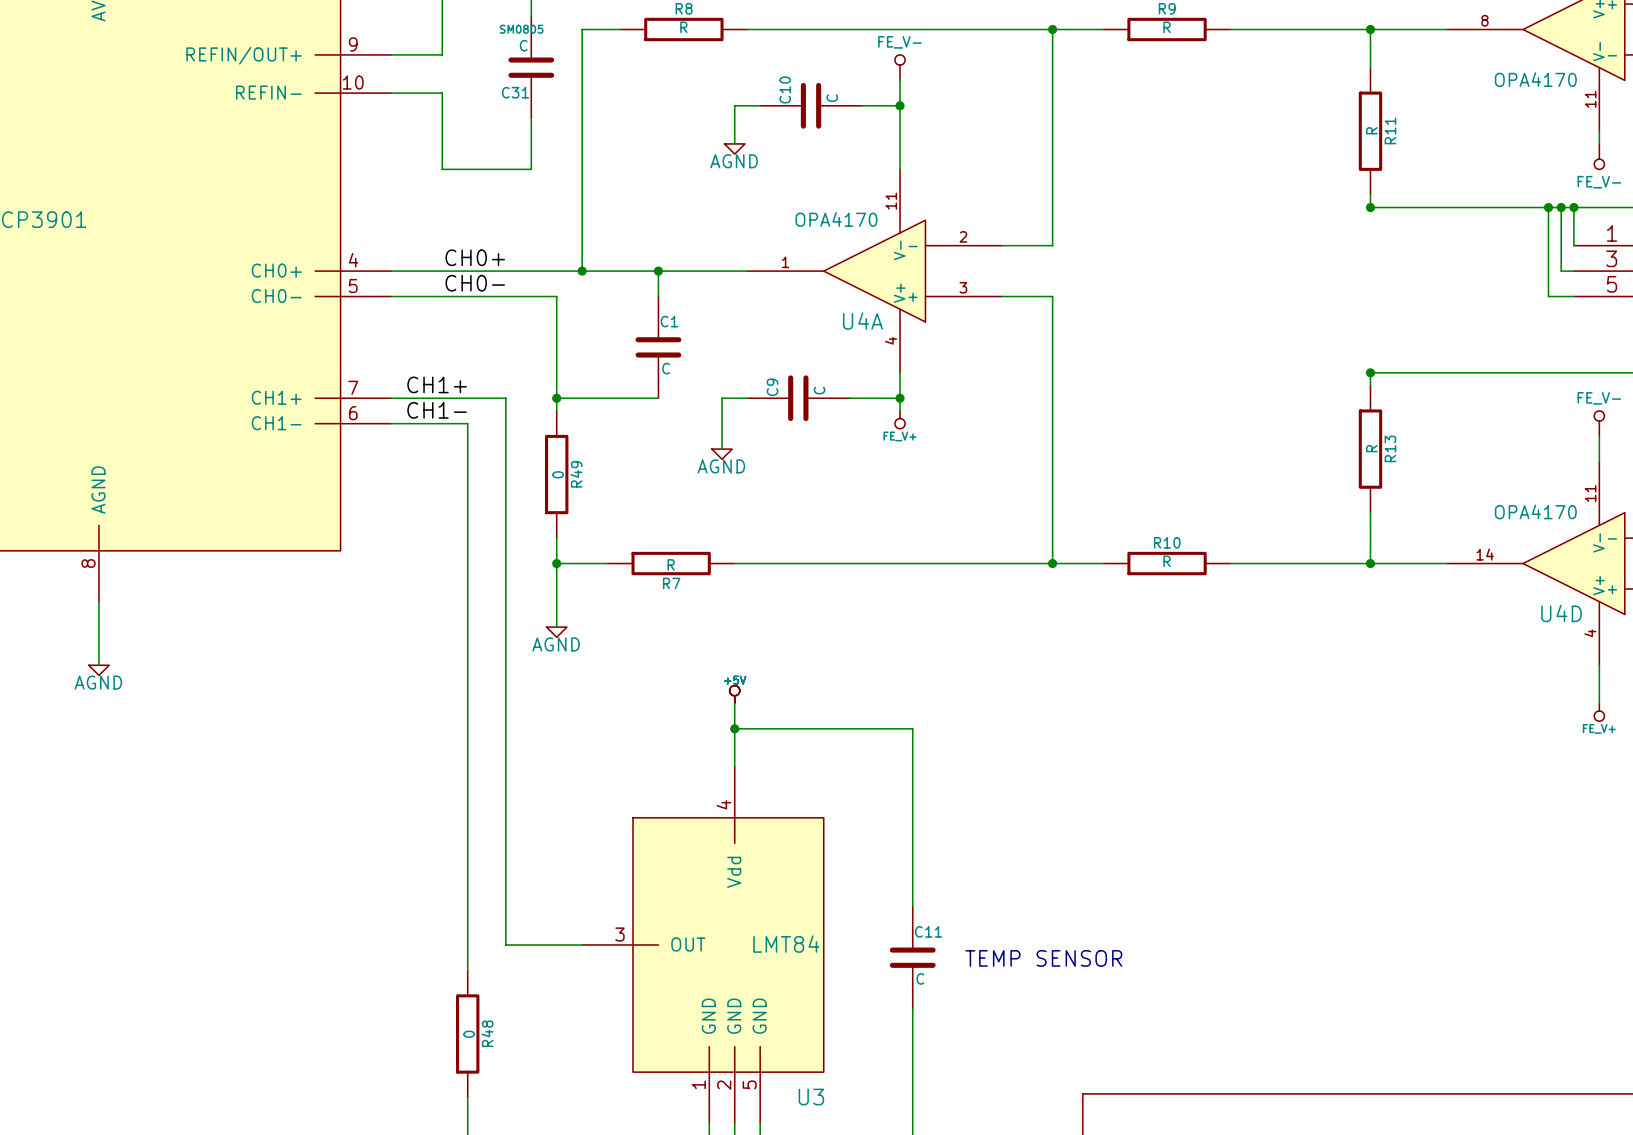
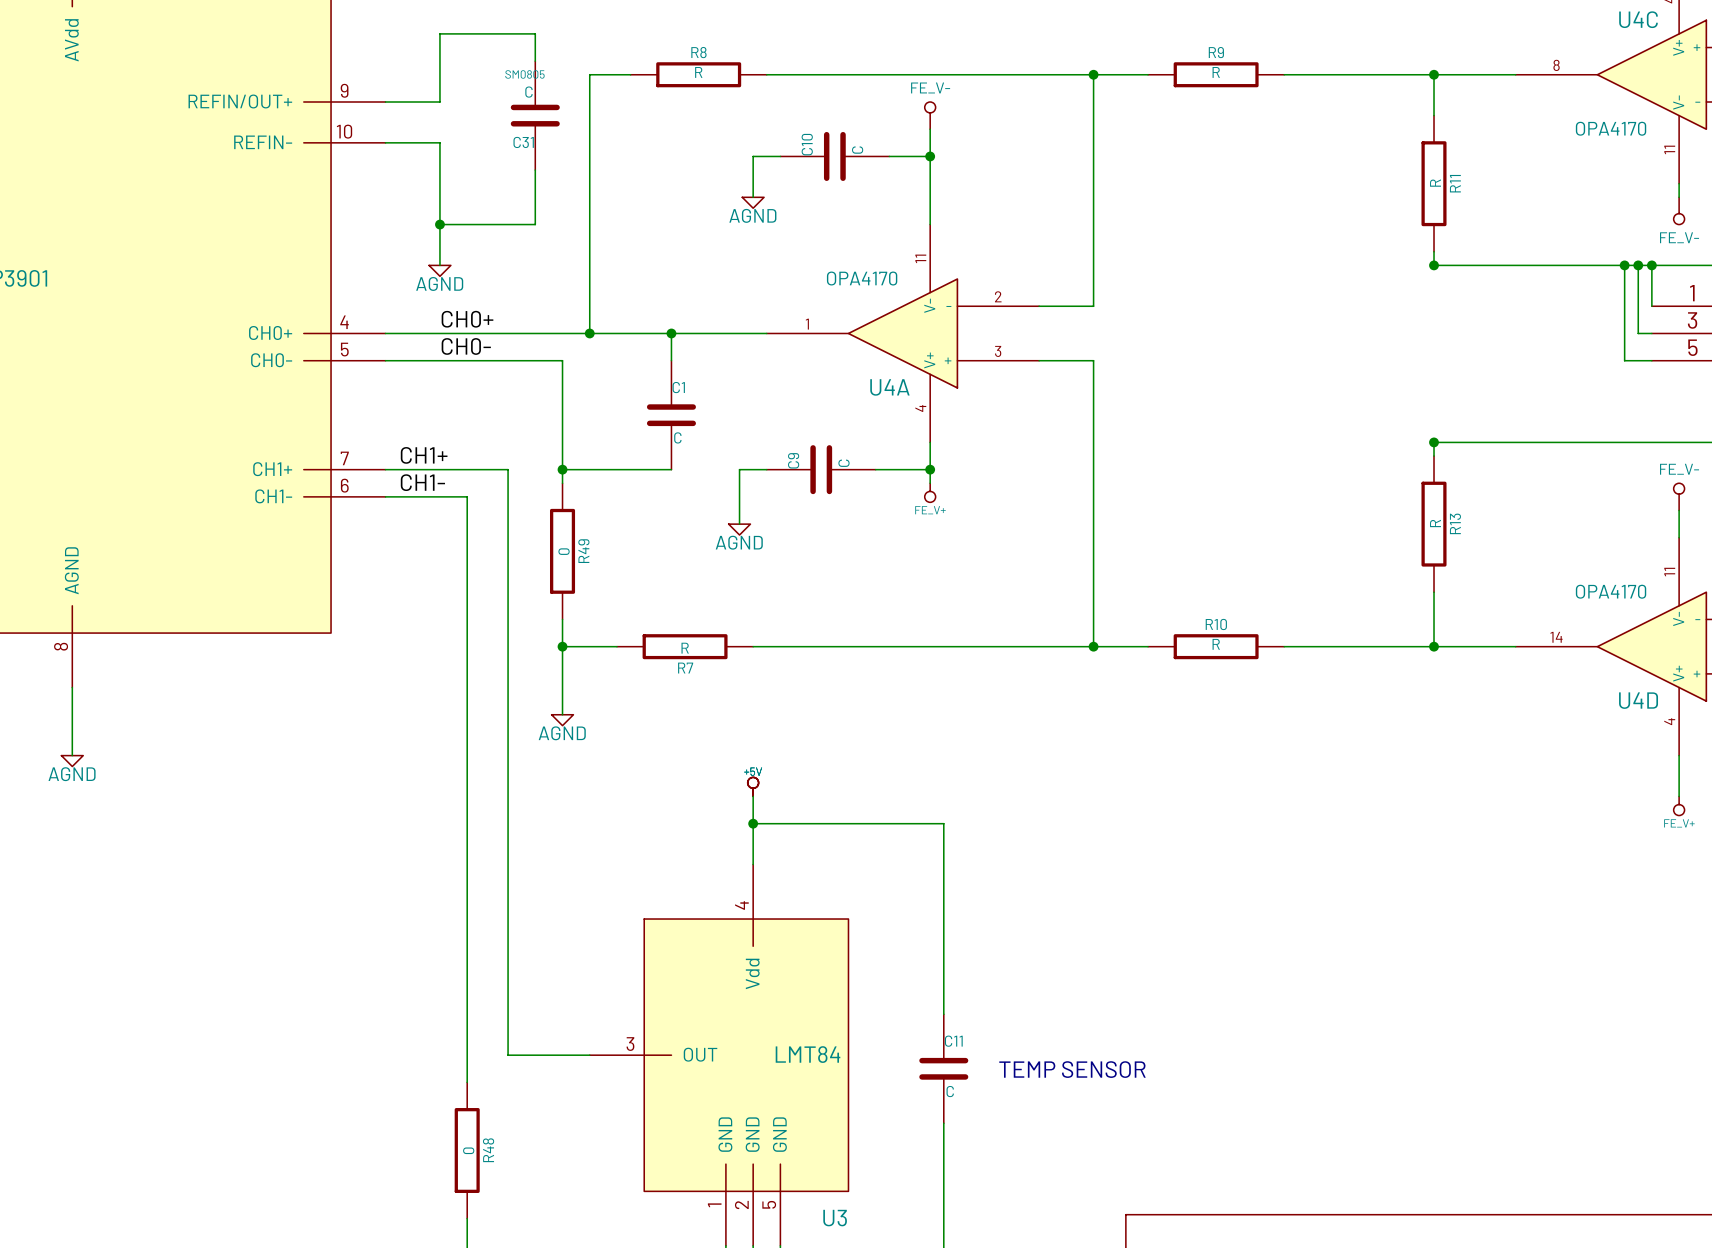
wire: none -> (439, 224) (439, 265)
junction: none -> (439, 224)
power symbol: none -> AGND (439, 270)

